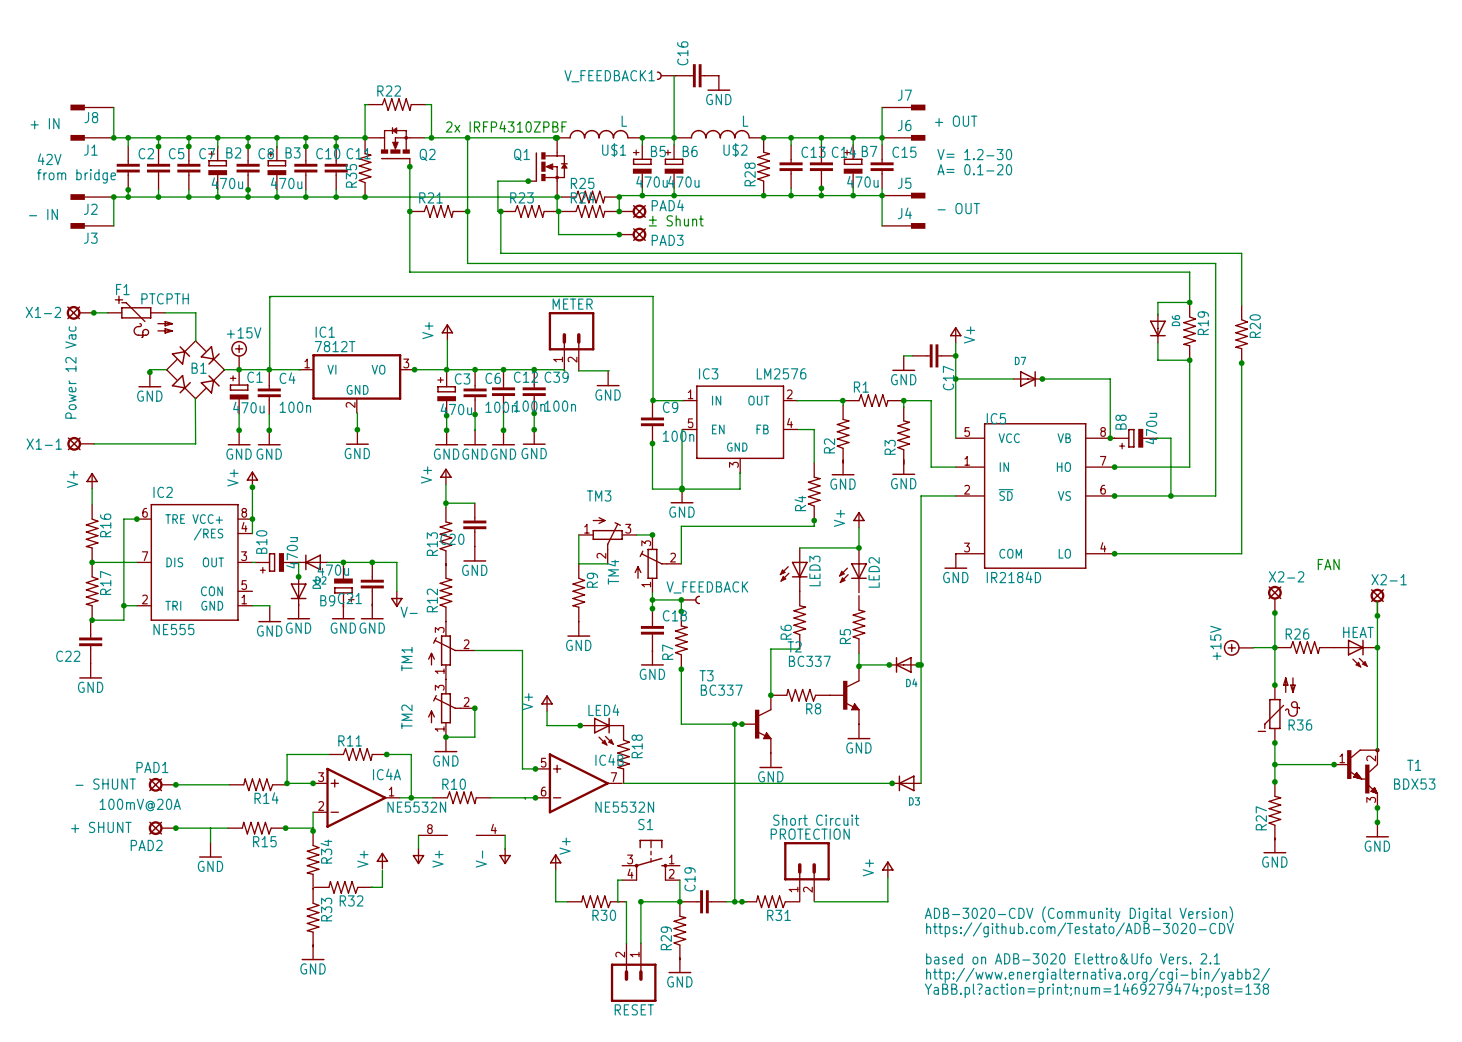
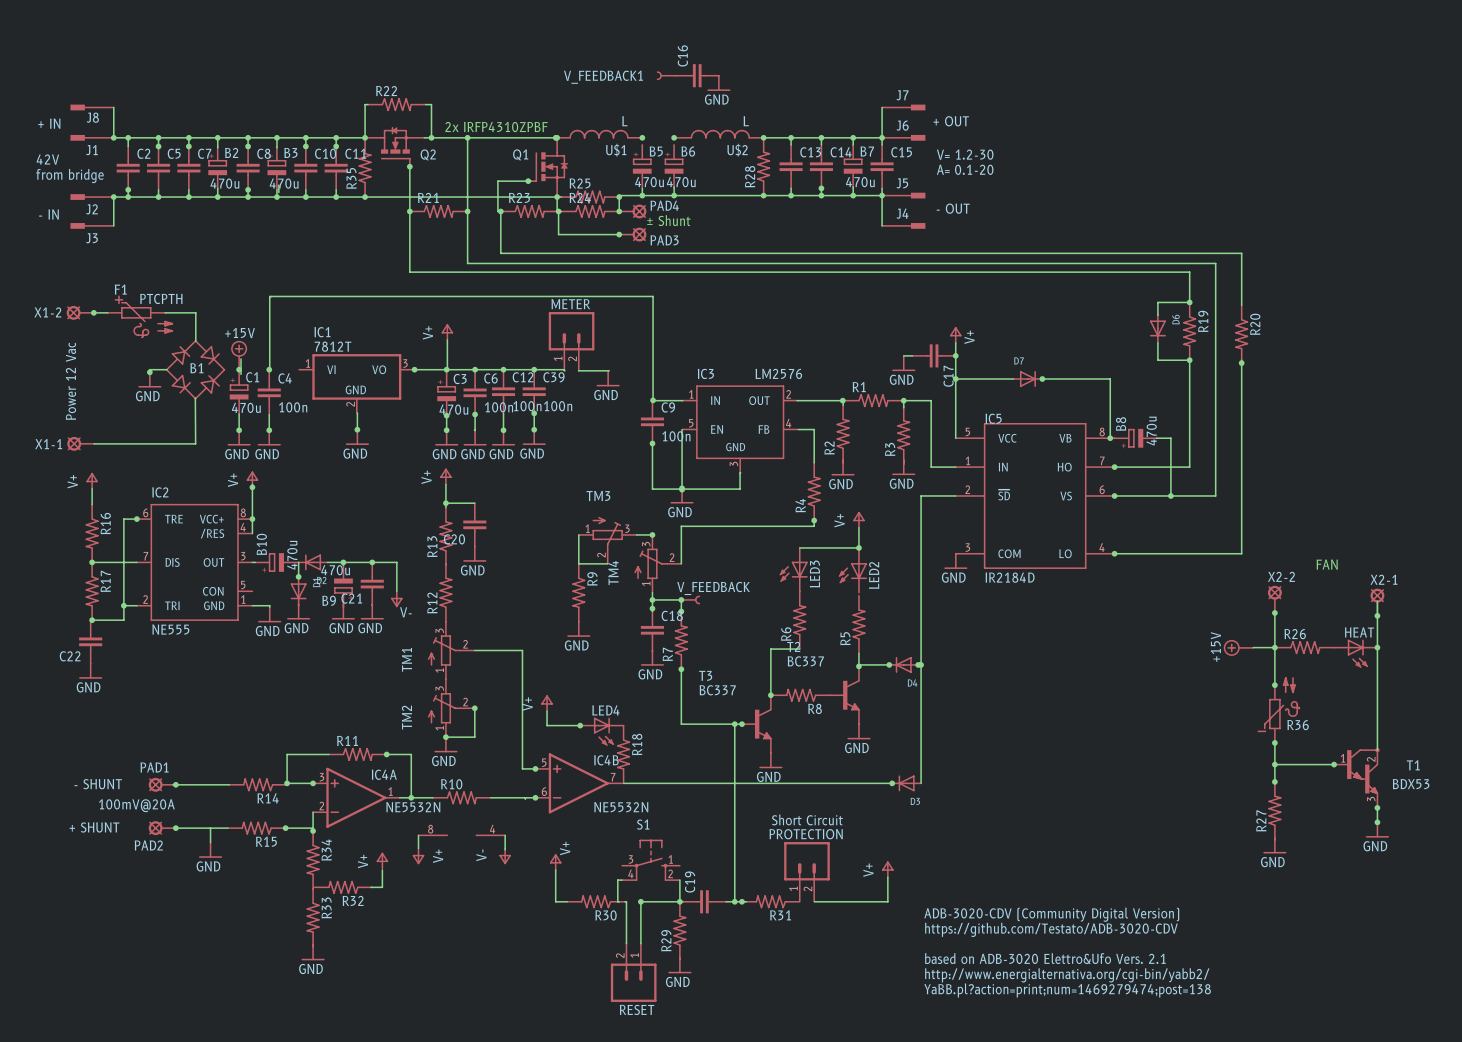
wire: (674, 75) (674, 145) -> none
wire: (677, 137) (642, 137) (642, 145) -> none
wire: none -> (278, 185) (278, 192)
wire: none -> (241, 358) (241, 374)
wire: (223, 369) (300, 369) -> none

